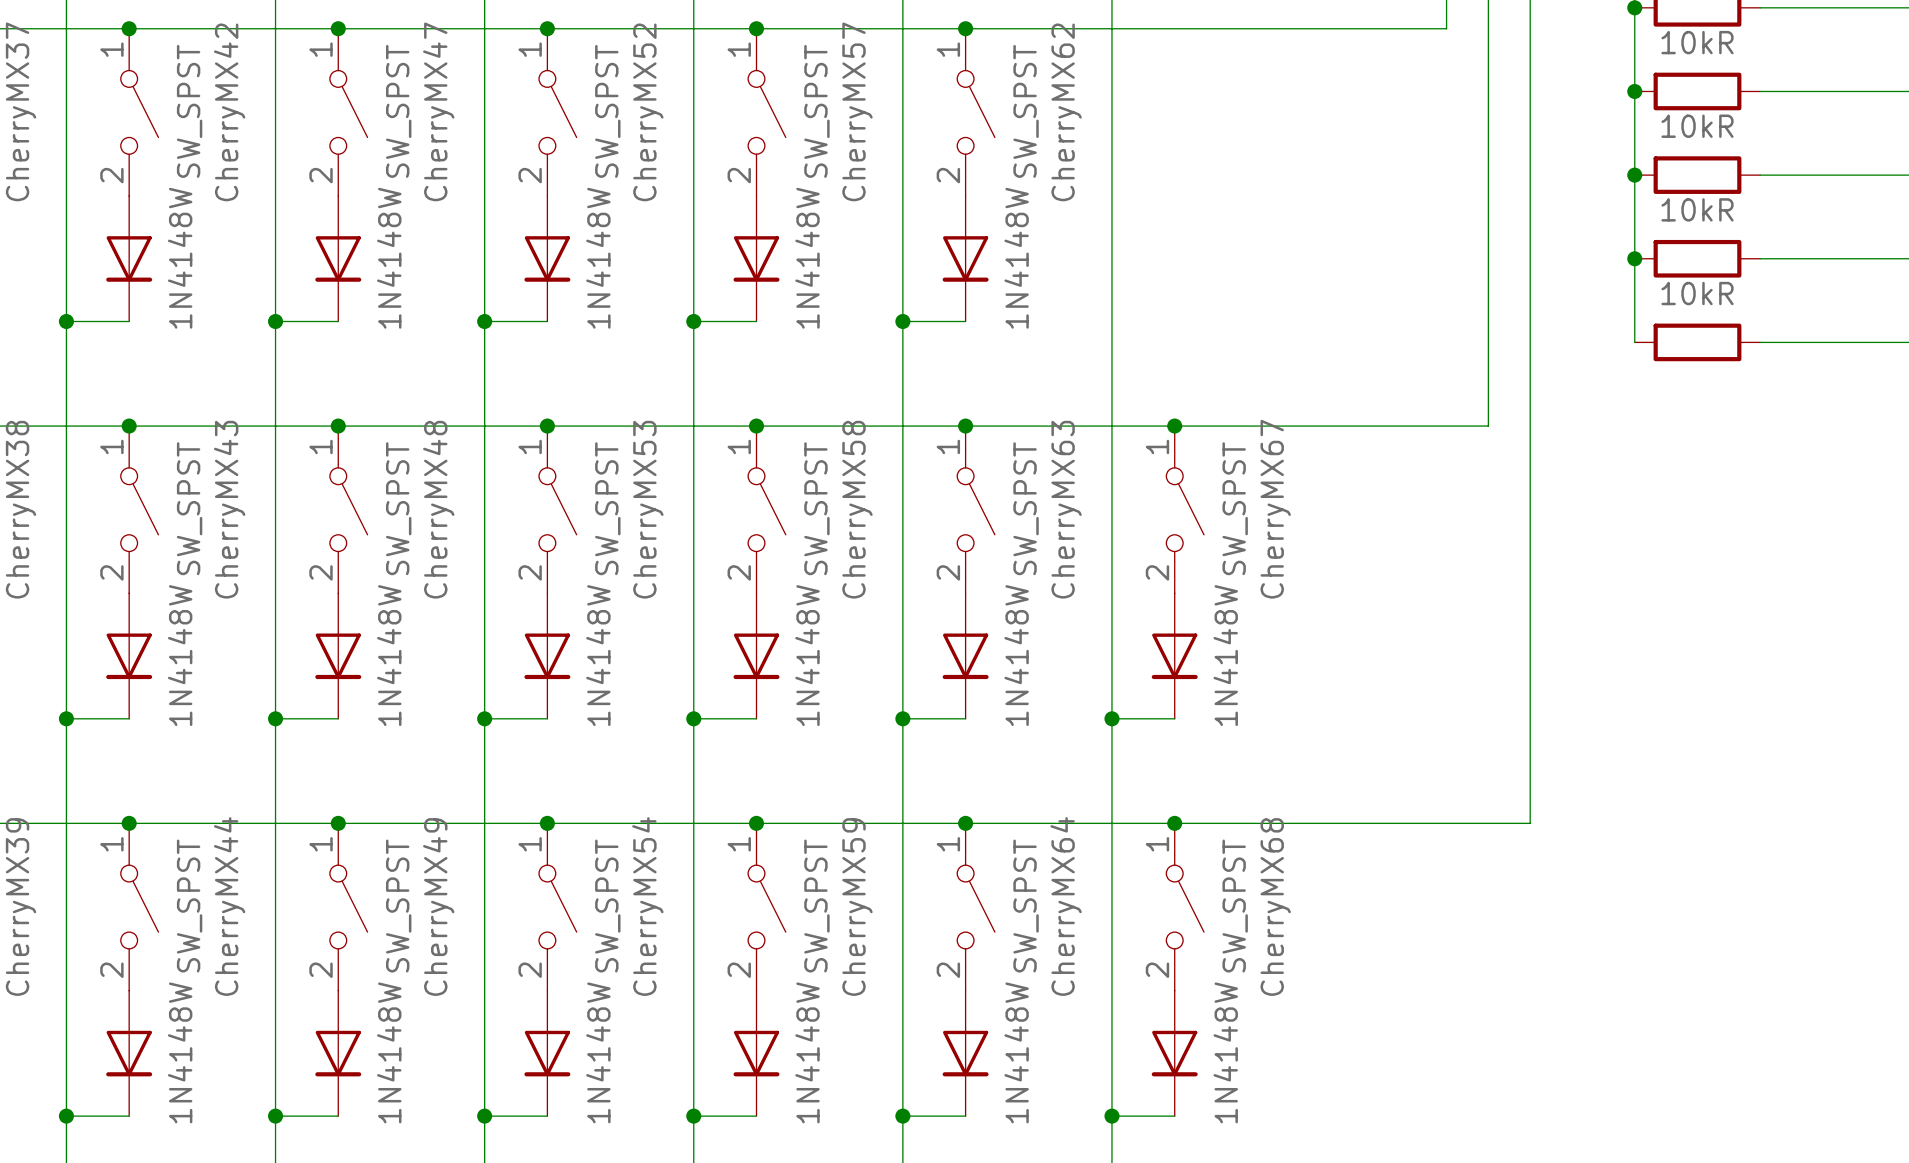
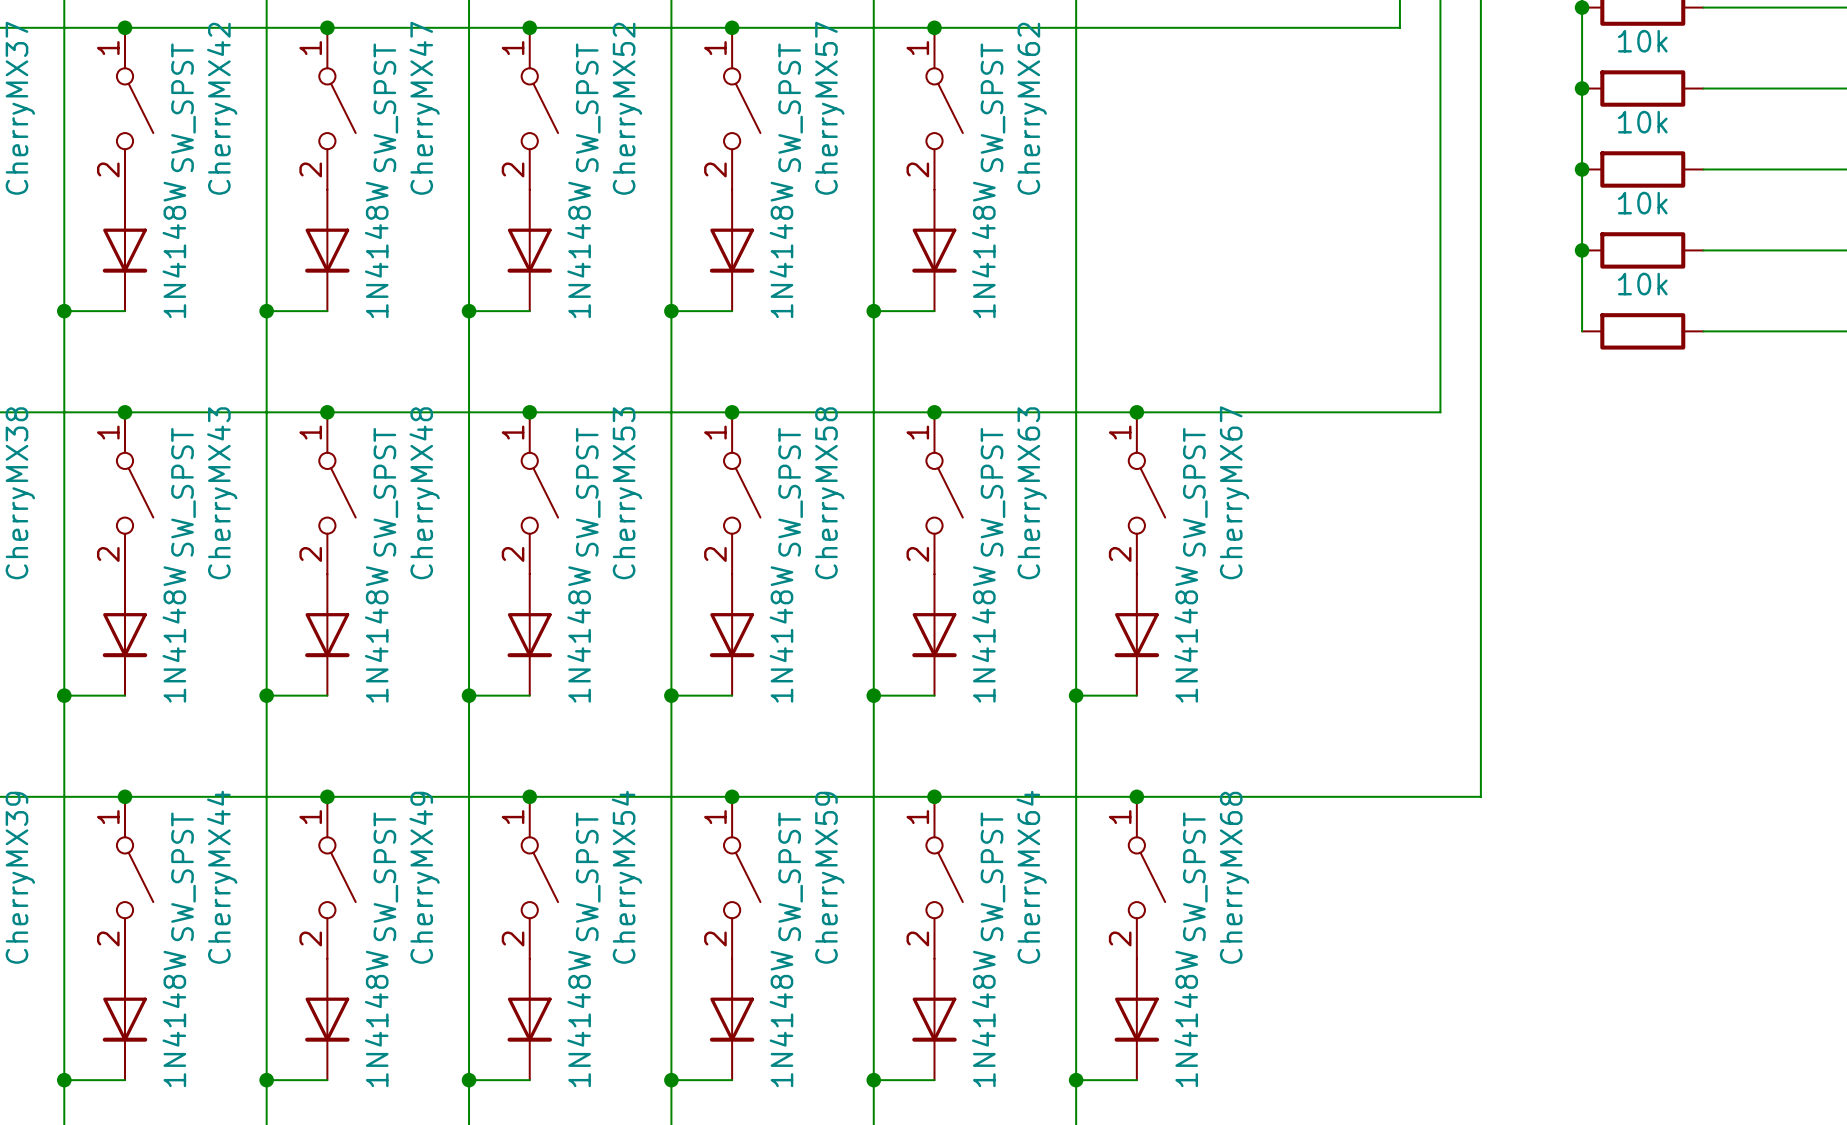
part value: 10kR (1697, 42) -> 10k (1642, 41)
part value: 10kR (1697, 126) -> 10k (1642, 122)
part value: 10kR (1697, 209) -> 10k (1642, 203)
part value: 10kR (1697, 293) -> 10k (1642, 284)

